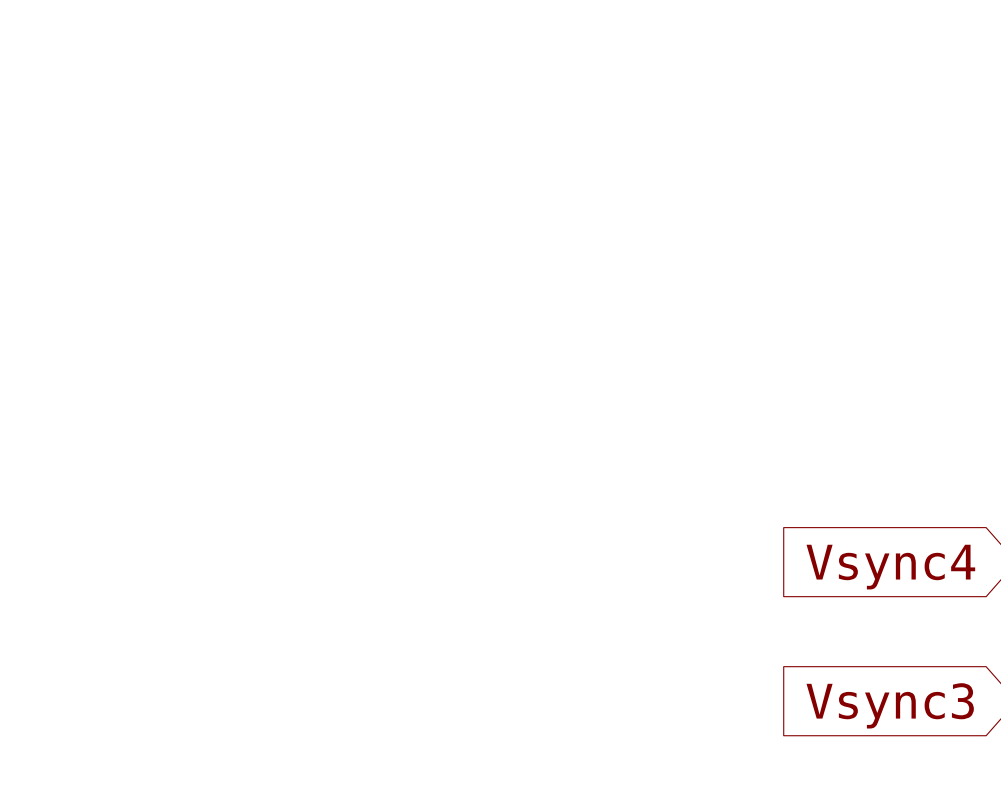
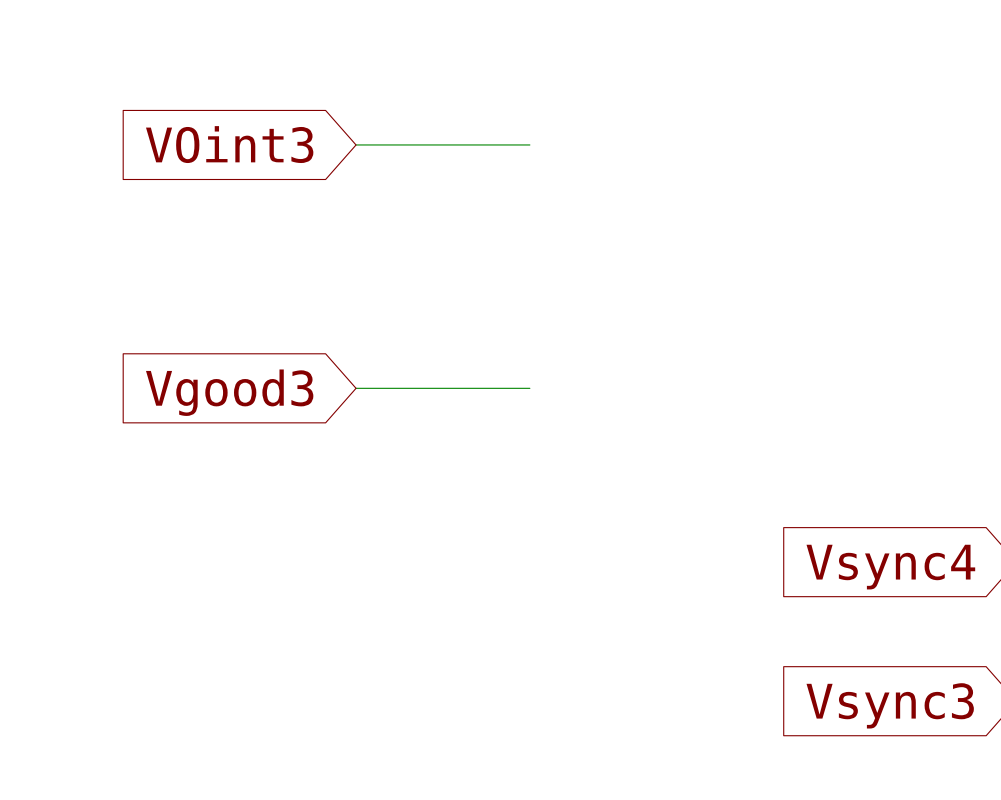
global label: none -> VOint3 (229, 144)
wire: none -> (356, 144) (529, 144)
wire: none -> (356, 388) (529, 388)
global label: none -> Vgood3 (229, 392)

